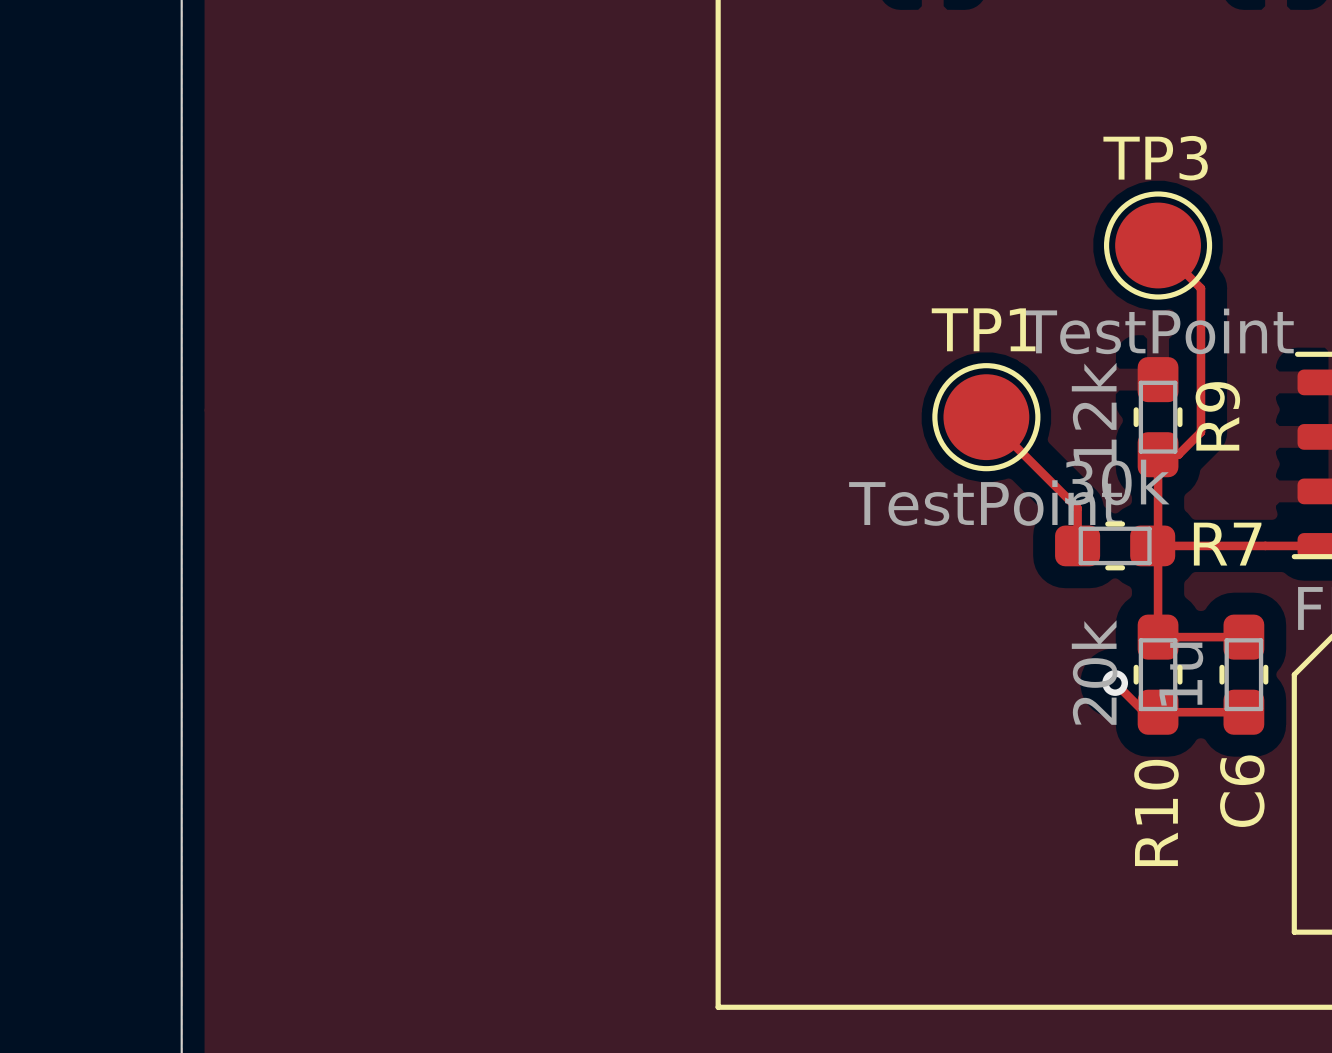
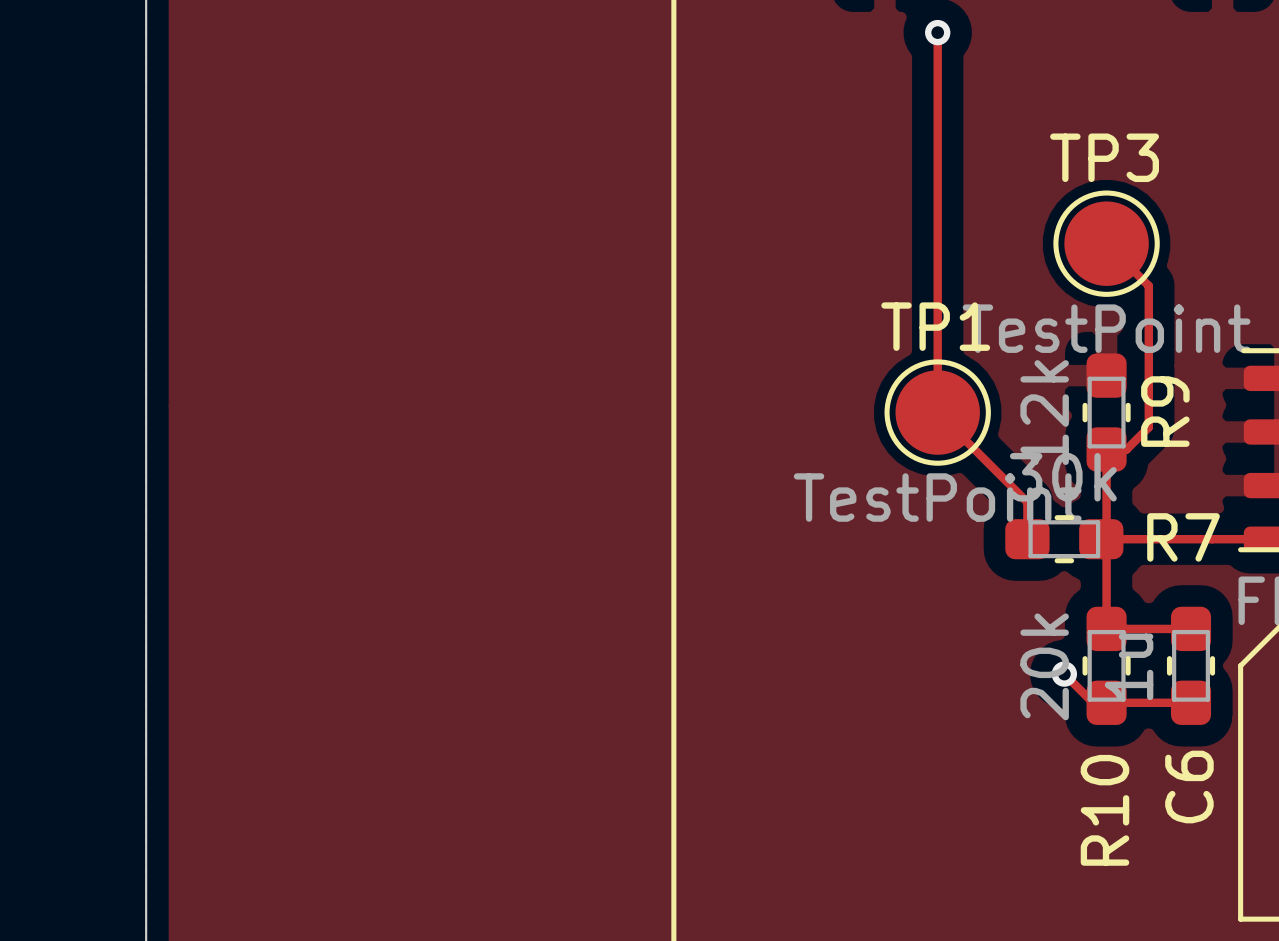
track: none -> (937, 32) (937, 412)
via: none -> (937, 32)

